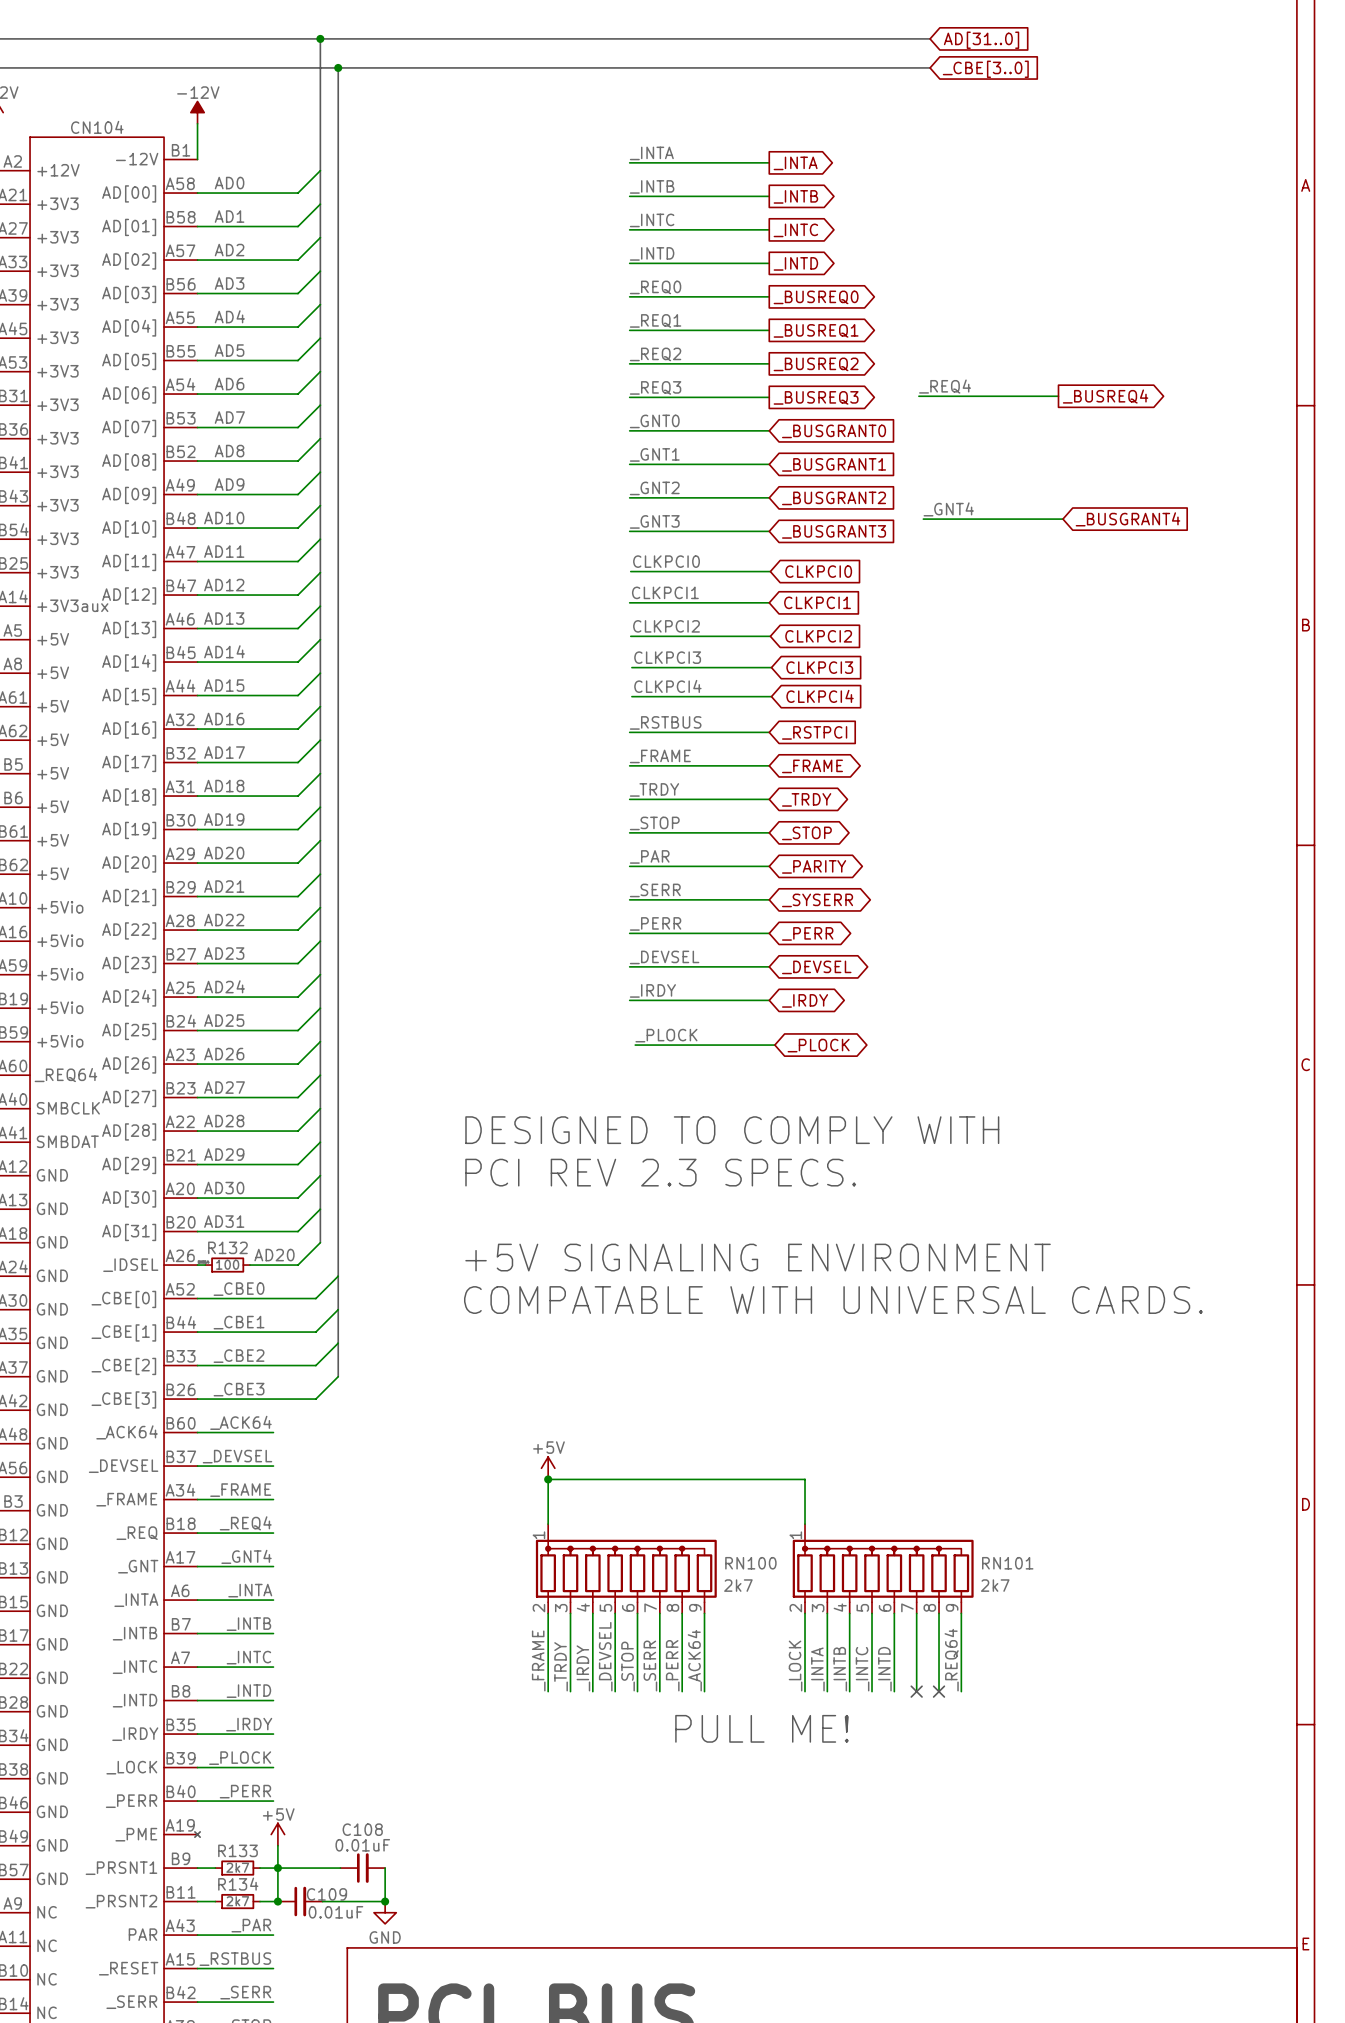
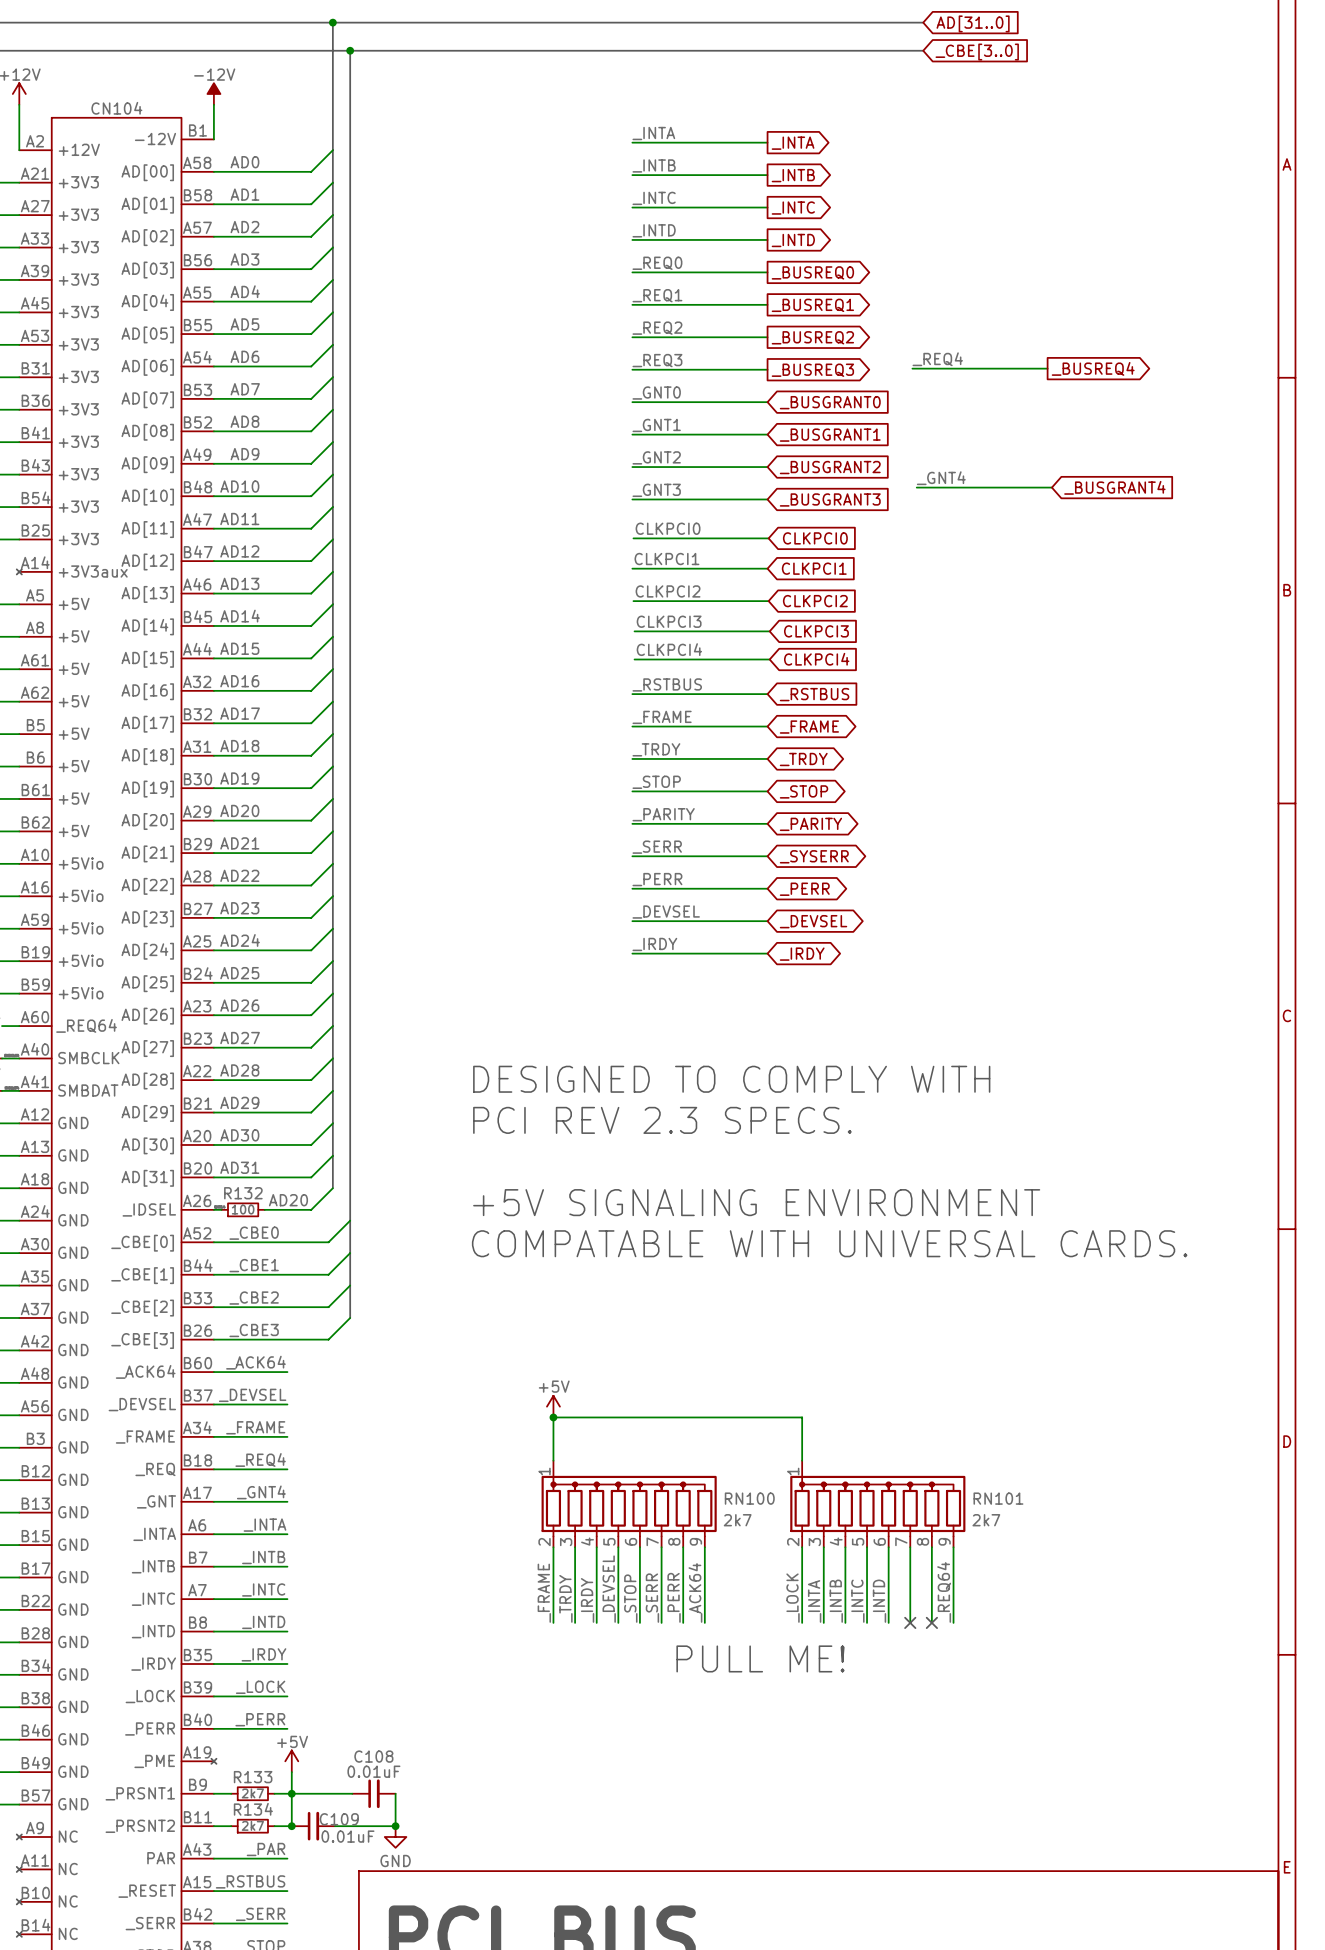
global label: _RSTPCI (814, 732) -> _RSTBUS (814, 694)
label: _PAR (649, 856) -> _PARITY (663, 814)
label: _PLOCK (666, 1035) -> none
wire: (635, 1045) (774, 1045) -> none
global label: _PLOCK (818, 1045) -> none
label: _PLOCK (240, 1758) -> _LOCK (260, 1687)

